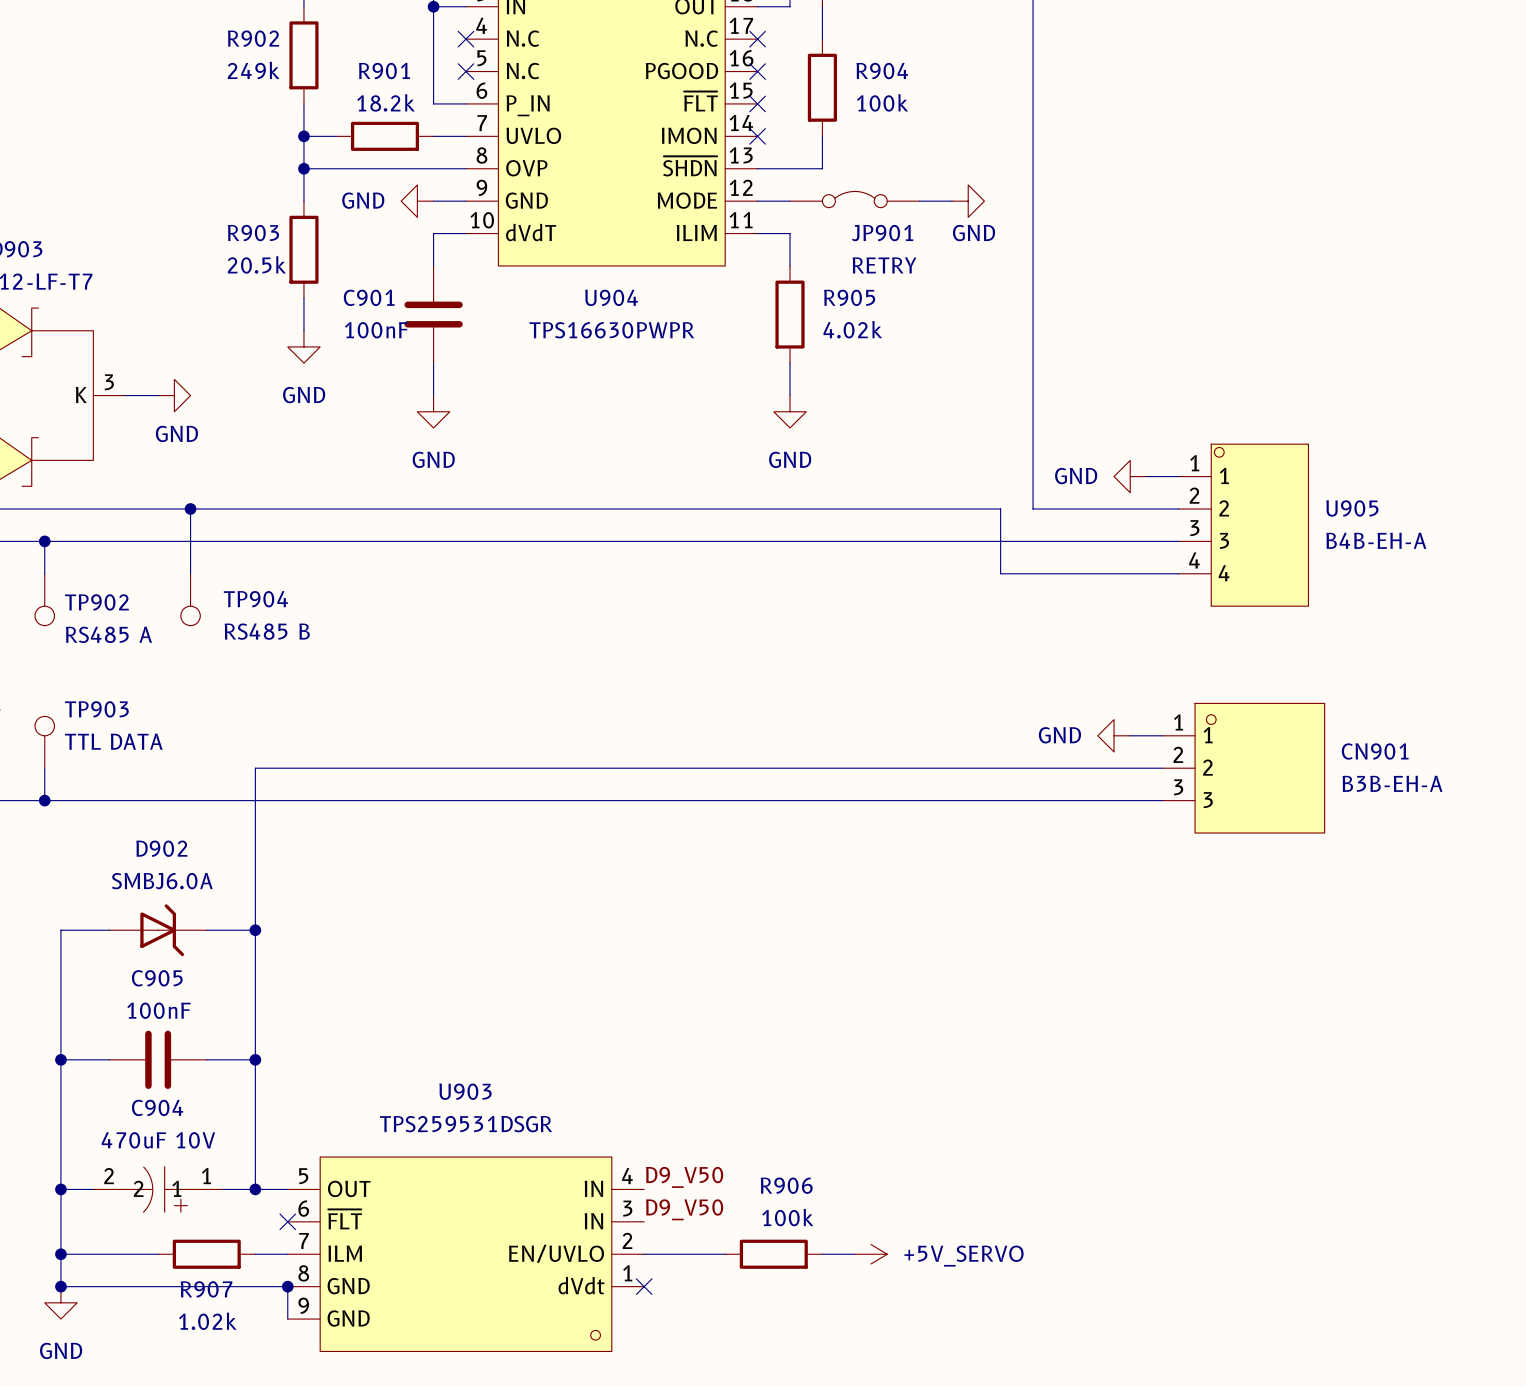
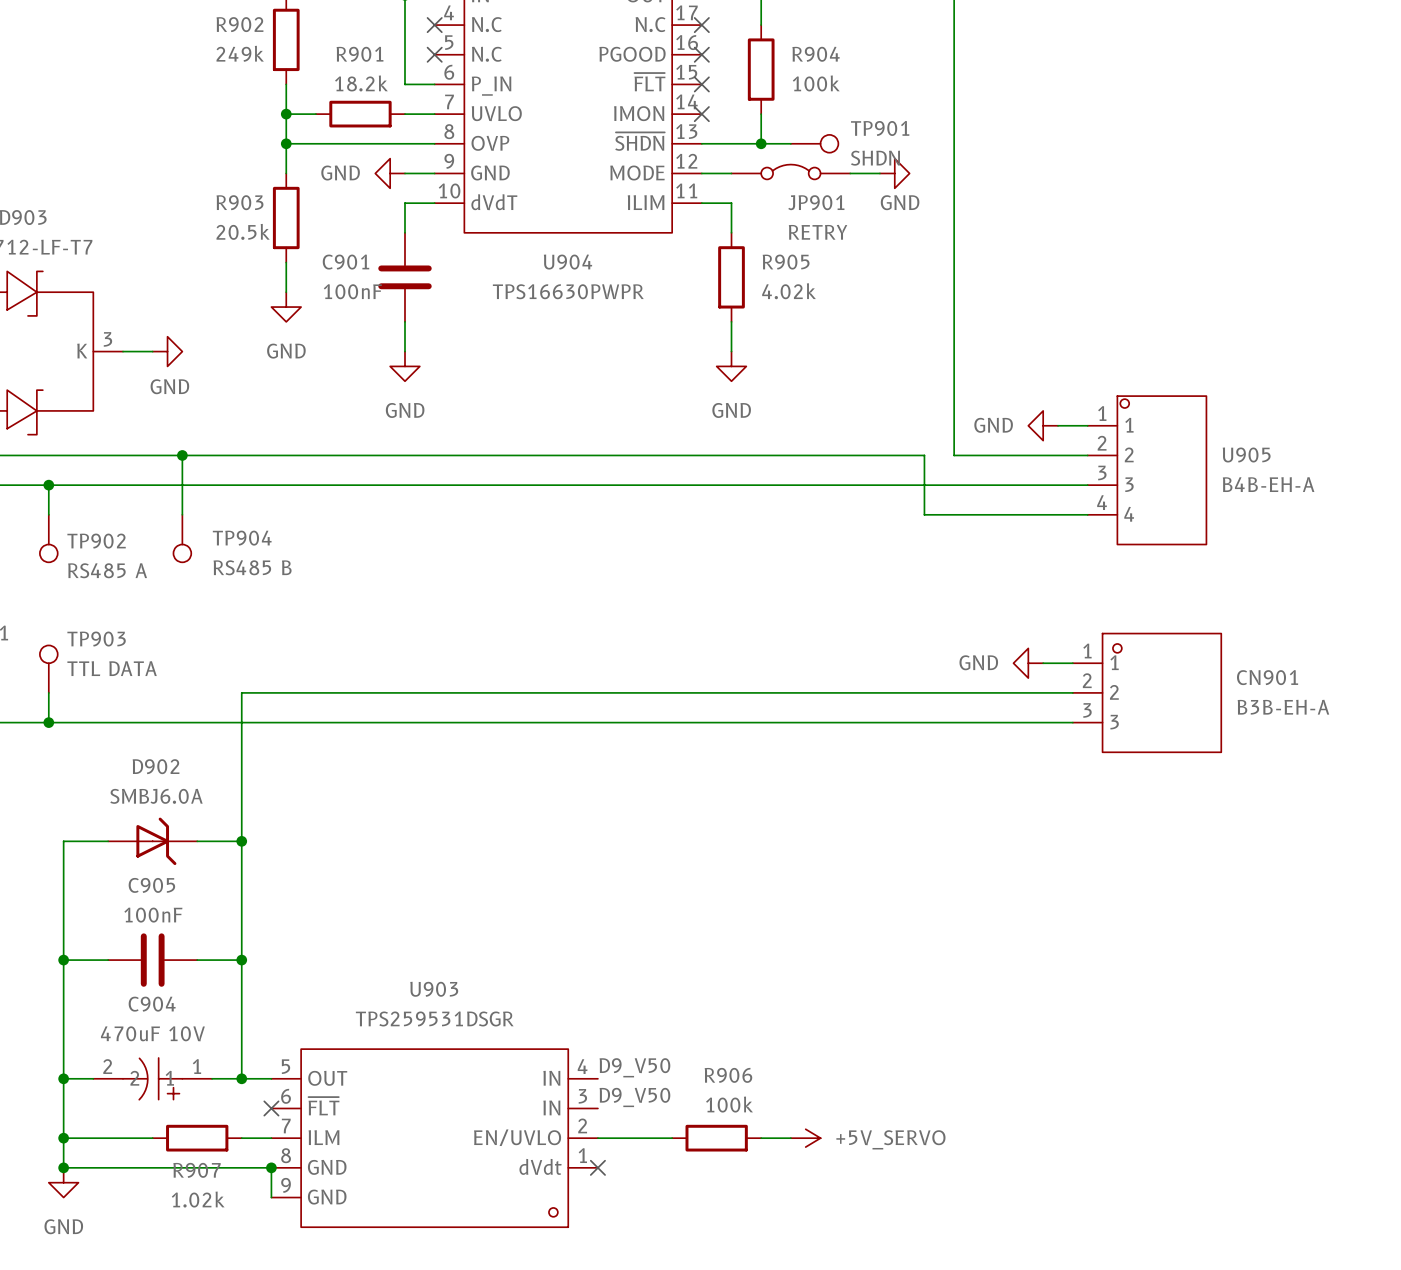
wire: none -> (761, 143) (790, 143)
junction: none -> (761, 143)
TP901: none -> SHDN (814, 143)

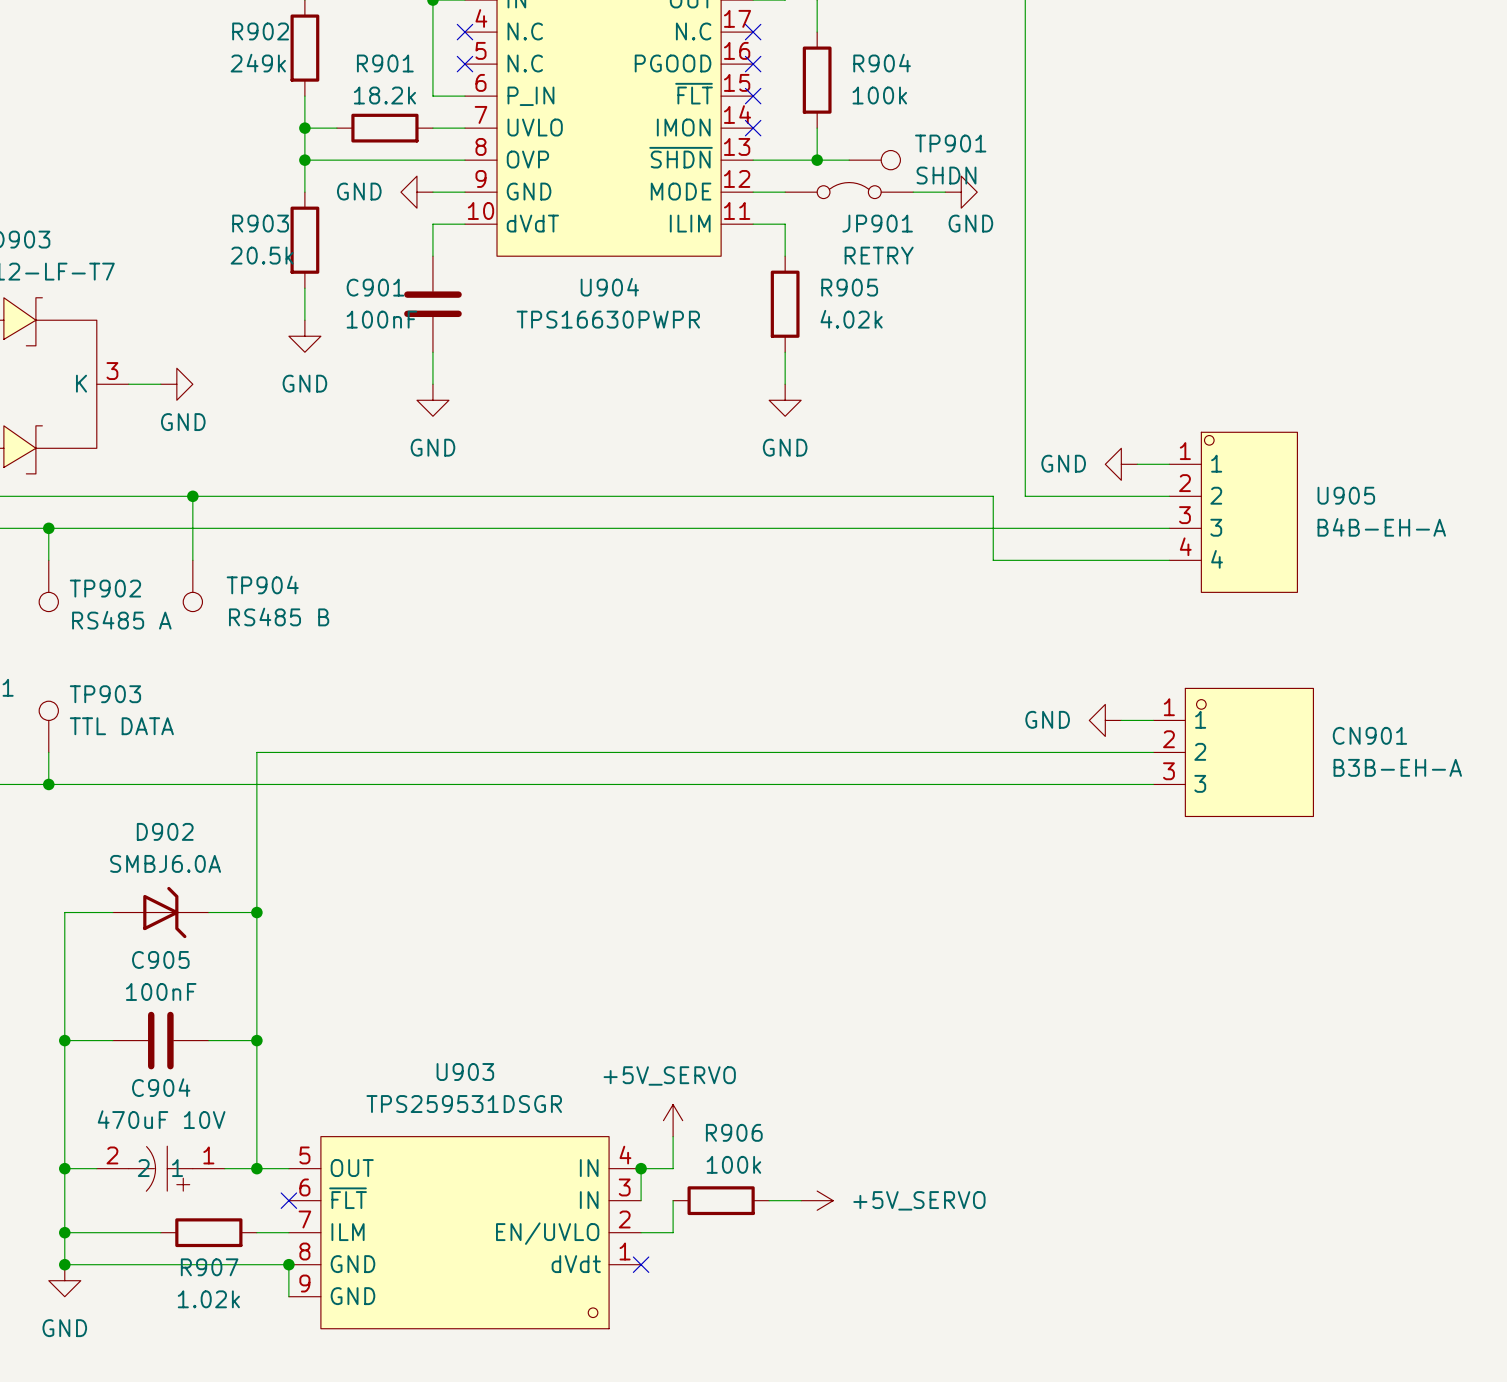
power symbol: none -> +5V_SERVO (673, 1120)
wire: none -> (673, 1136) (673, 1168) (641, 1168) (641, 1200)
label: D9_V50 (634, 1067) -> none
junction: none -> (641, 1168)
label: D9_V50 (634, 1097) -> none
wire: (627, 1138) (672, 1138) -> (673, 1232) (673, 1200)
R906 position: (716, 1138) -> (721, 1200)
wire: (761, 1138) (790, 1138) -> (769, 1200) (801, 1200)
power symbol position: +5V_SERVO (805, 1138) -> +5V_SERVO (817, 1200)

